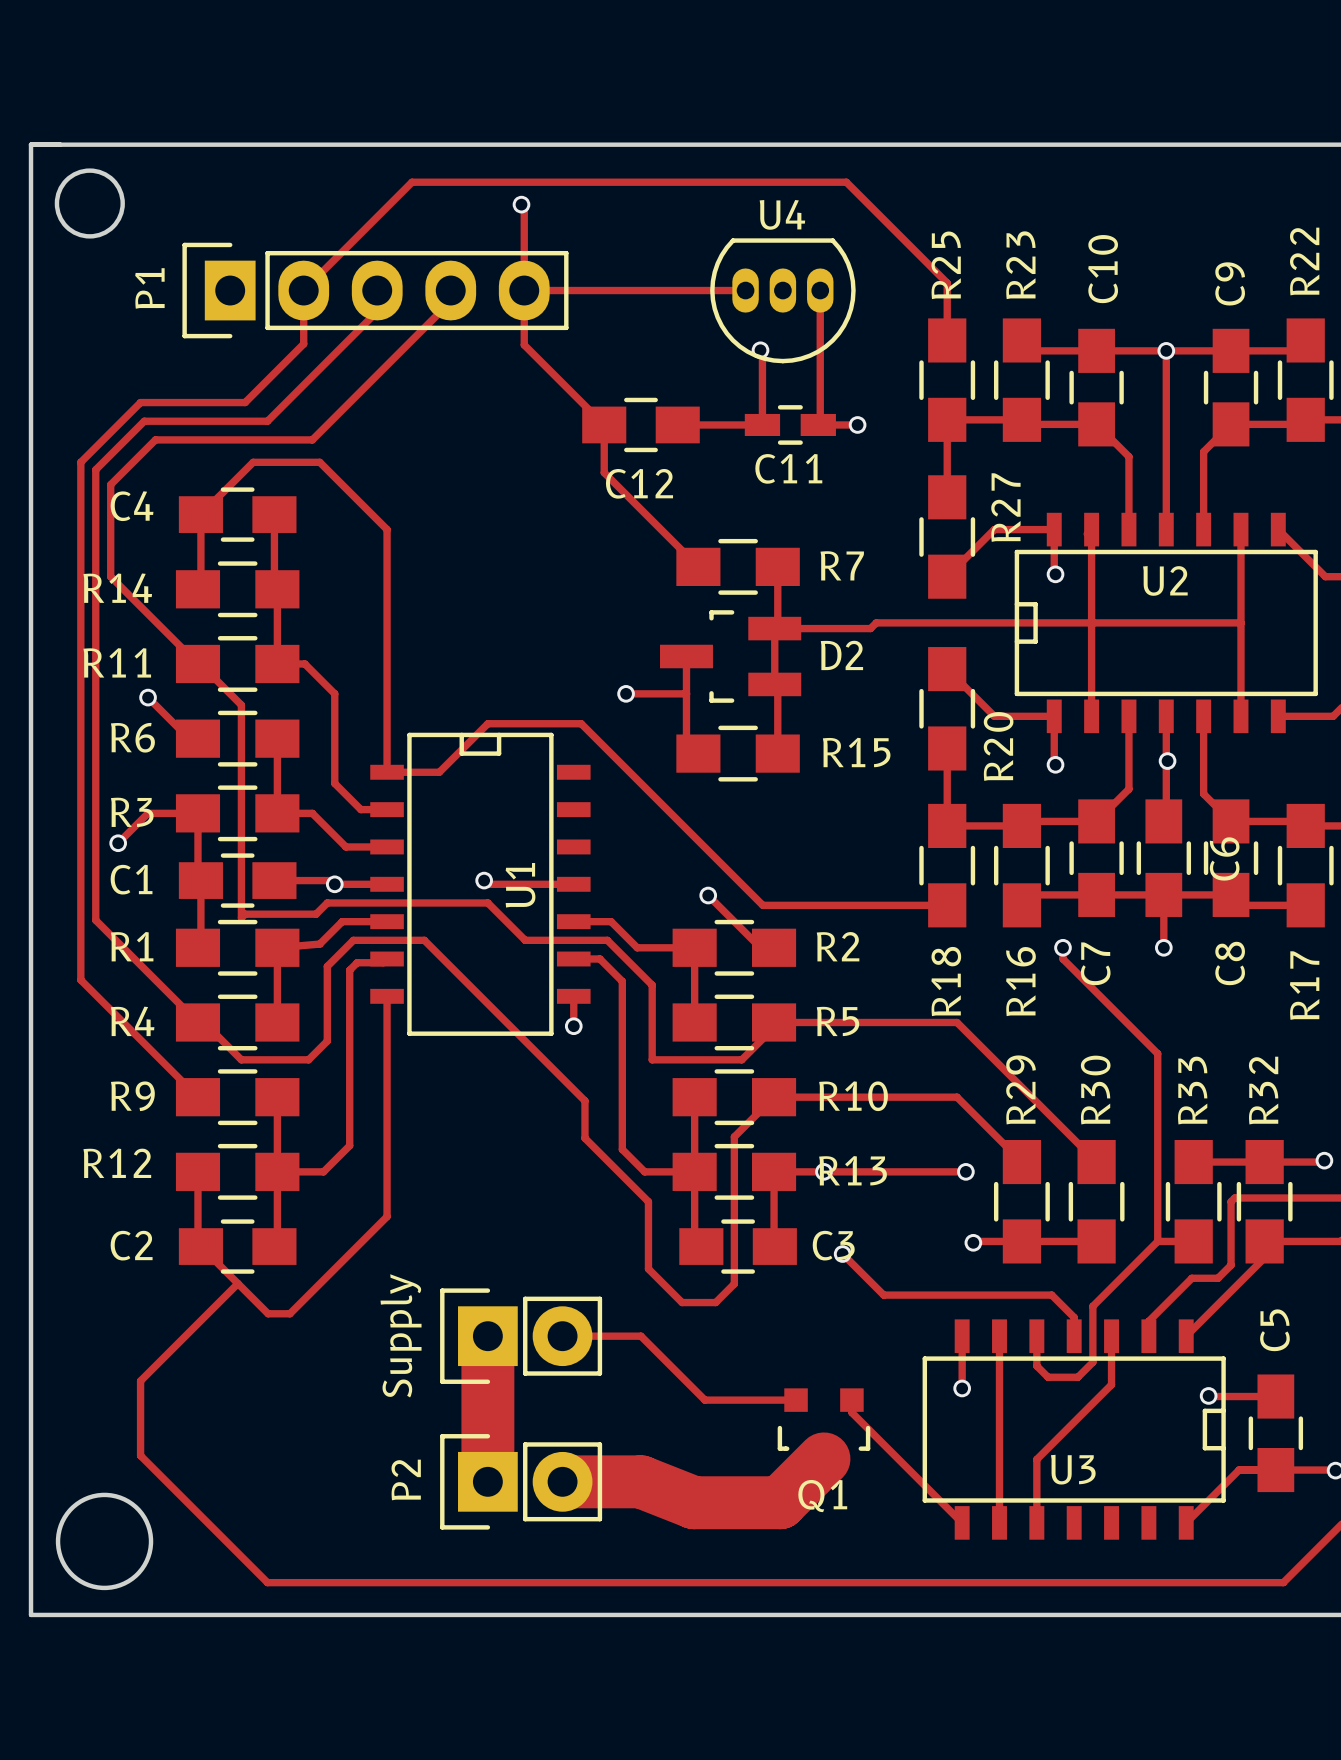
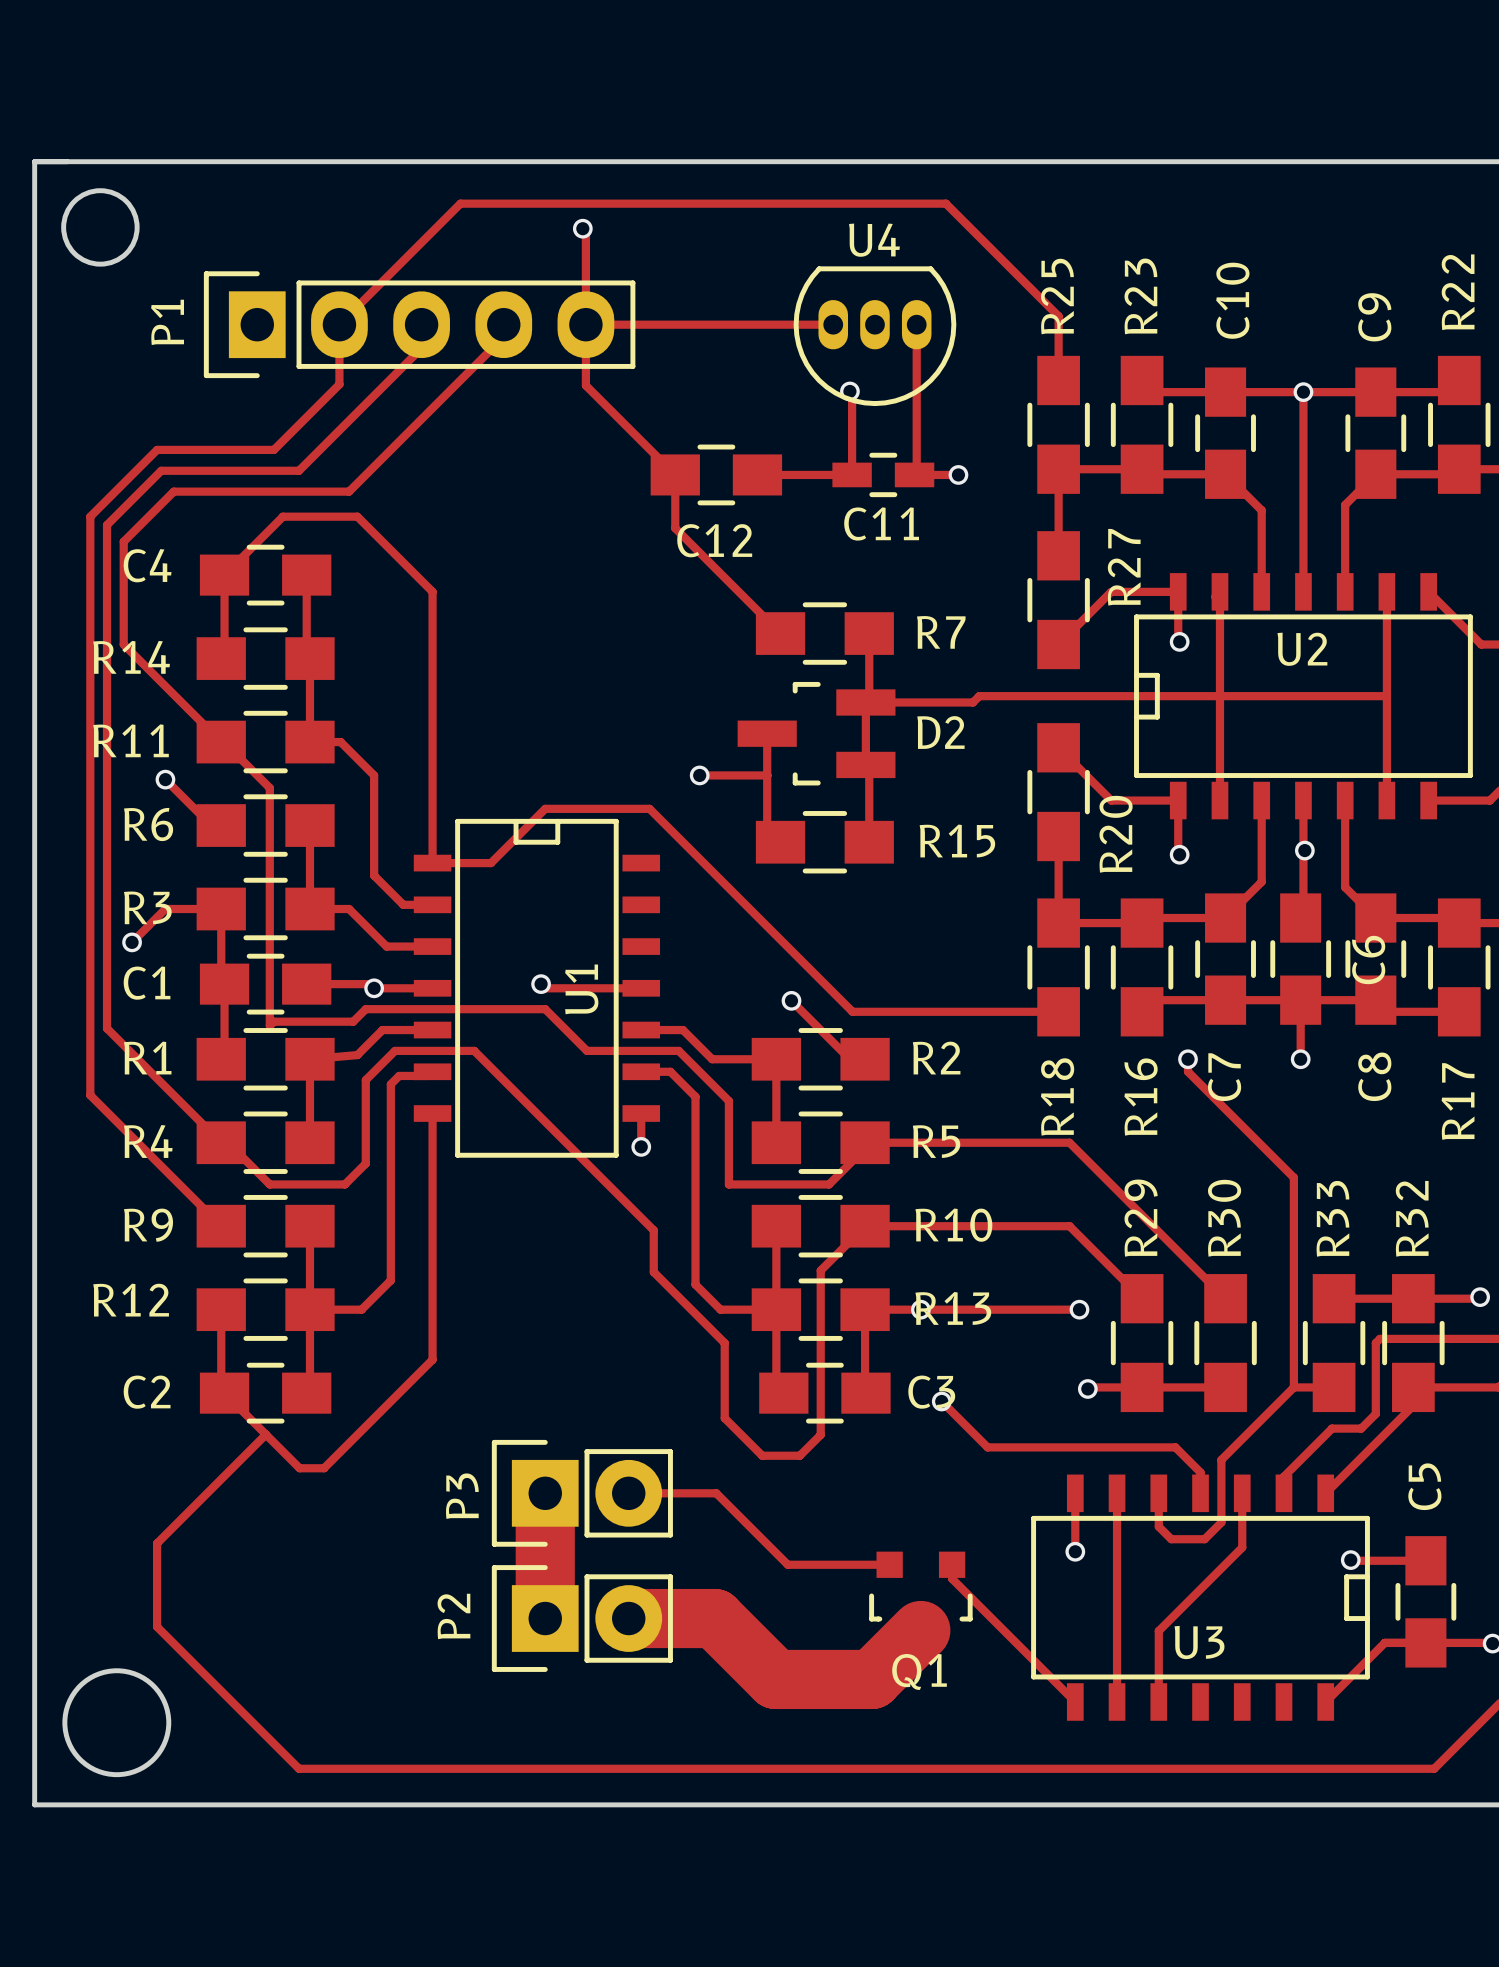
Supply name: Supply (401, 1335) -> P3 (462, 1496)
P2 position: (521, 1481) -> (582, 1618)
track: (562, 1481) (640, 1481) (694, 1502) -> (628, 1618) (714, 1618) (775, 1679)

